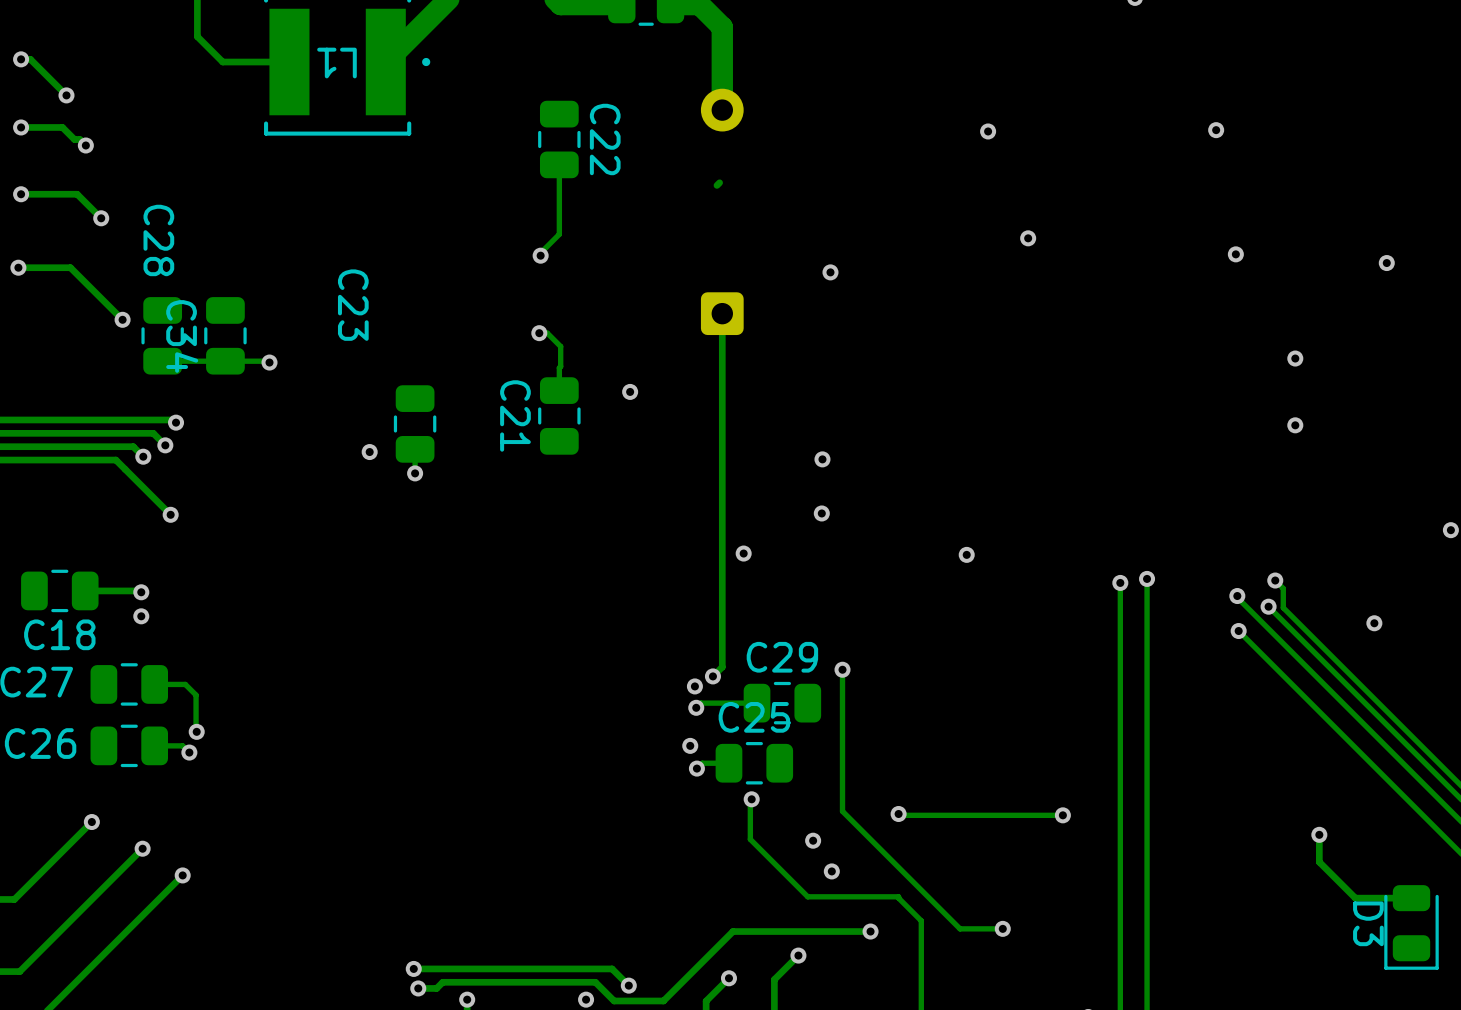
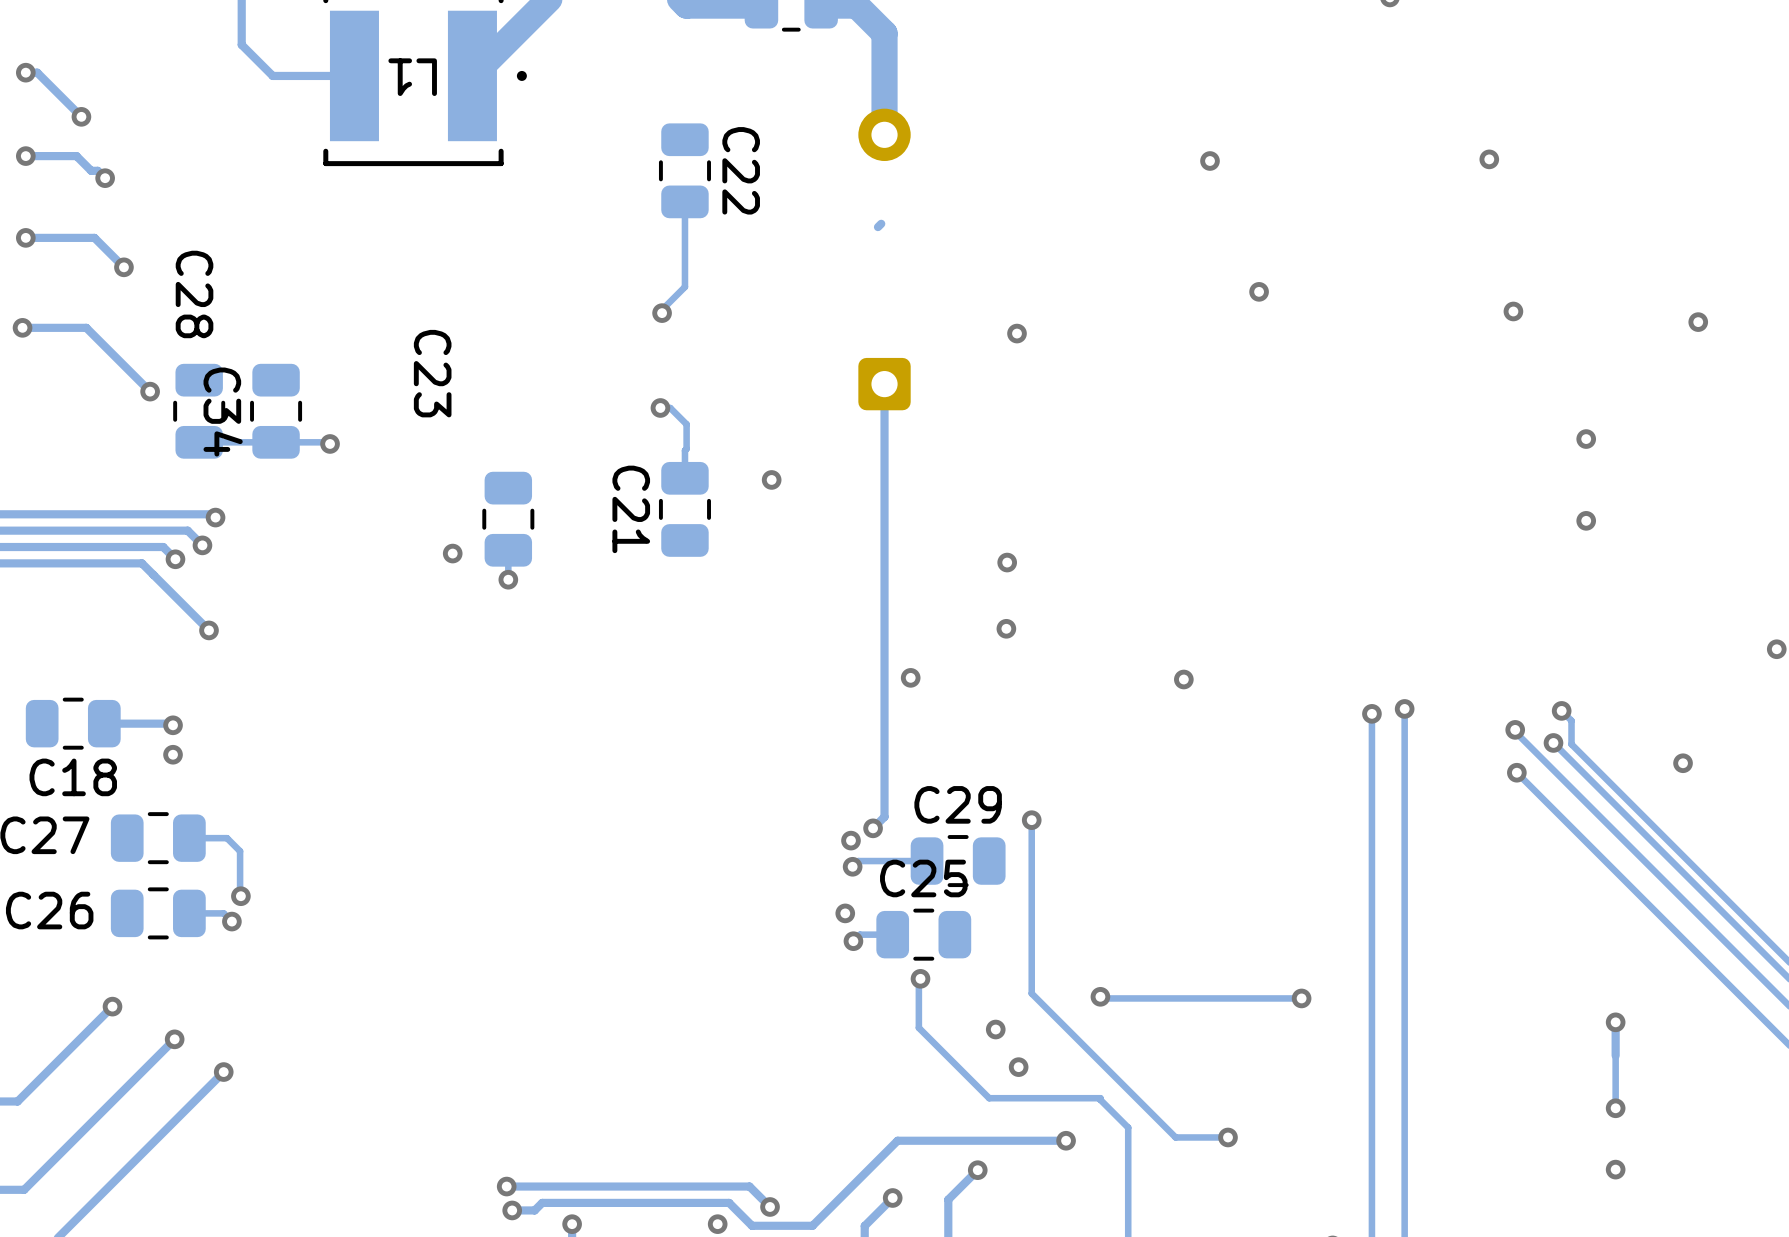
track: (1319, 862) (1355, 898) (1411, 898) -> (1615, 1055) (1615, 1108)
via: none -> (1615, 1108)
D3: (1411, 927) -> none
via: none -> (1615, 1169)

